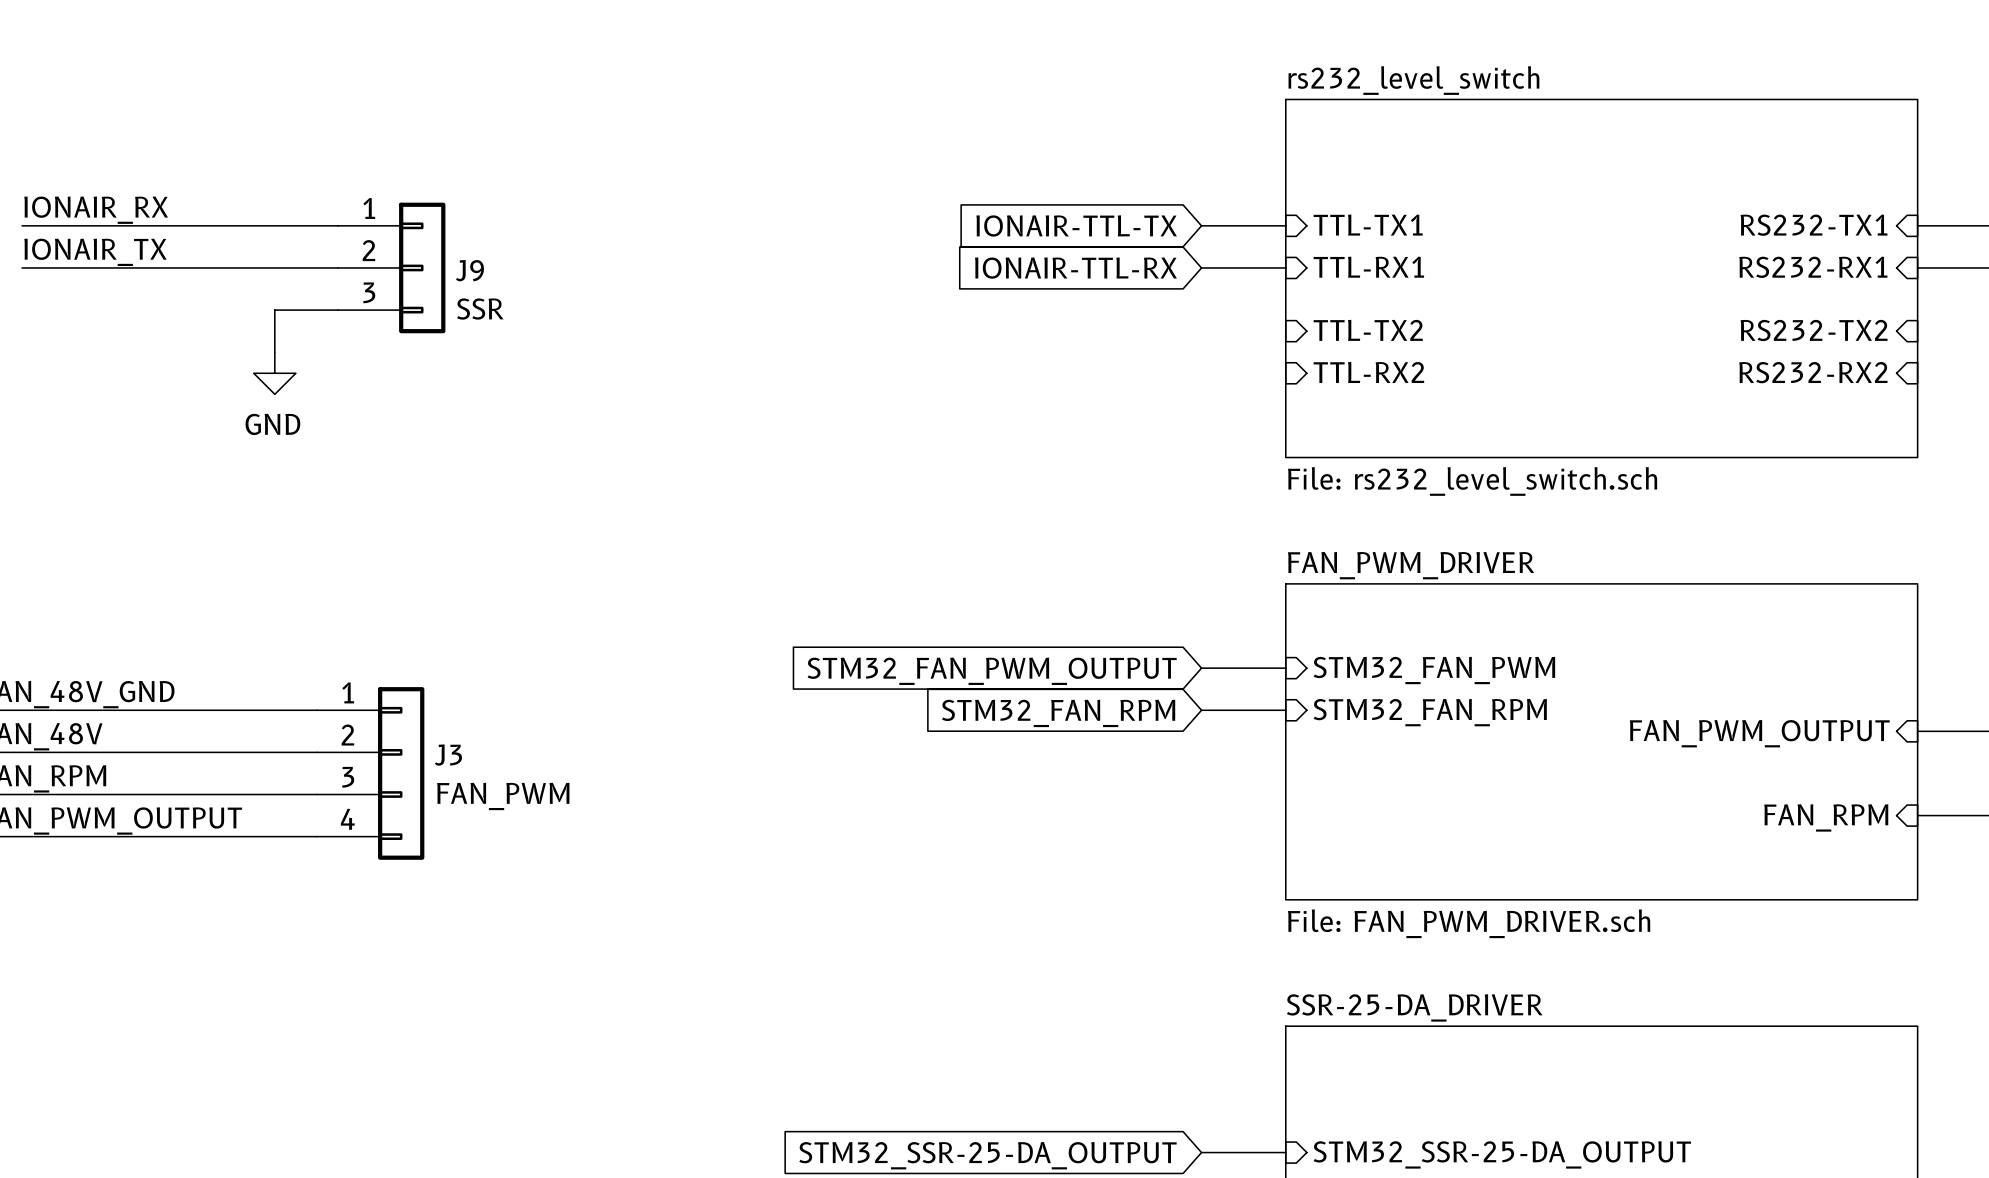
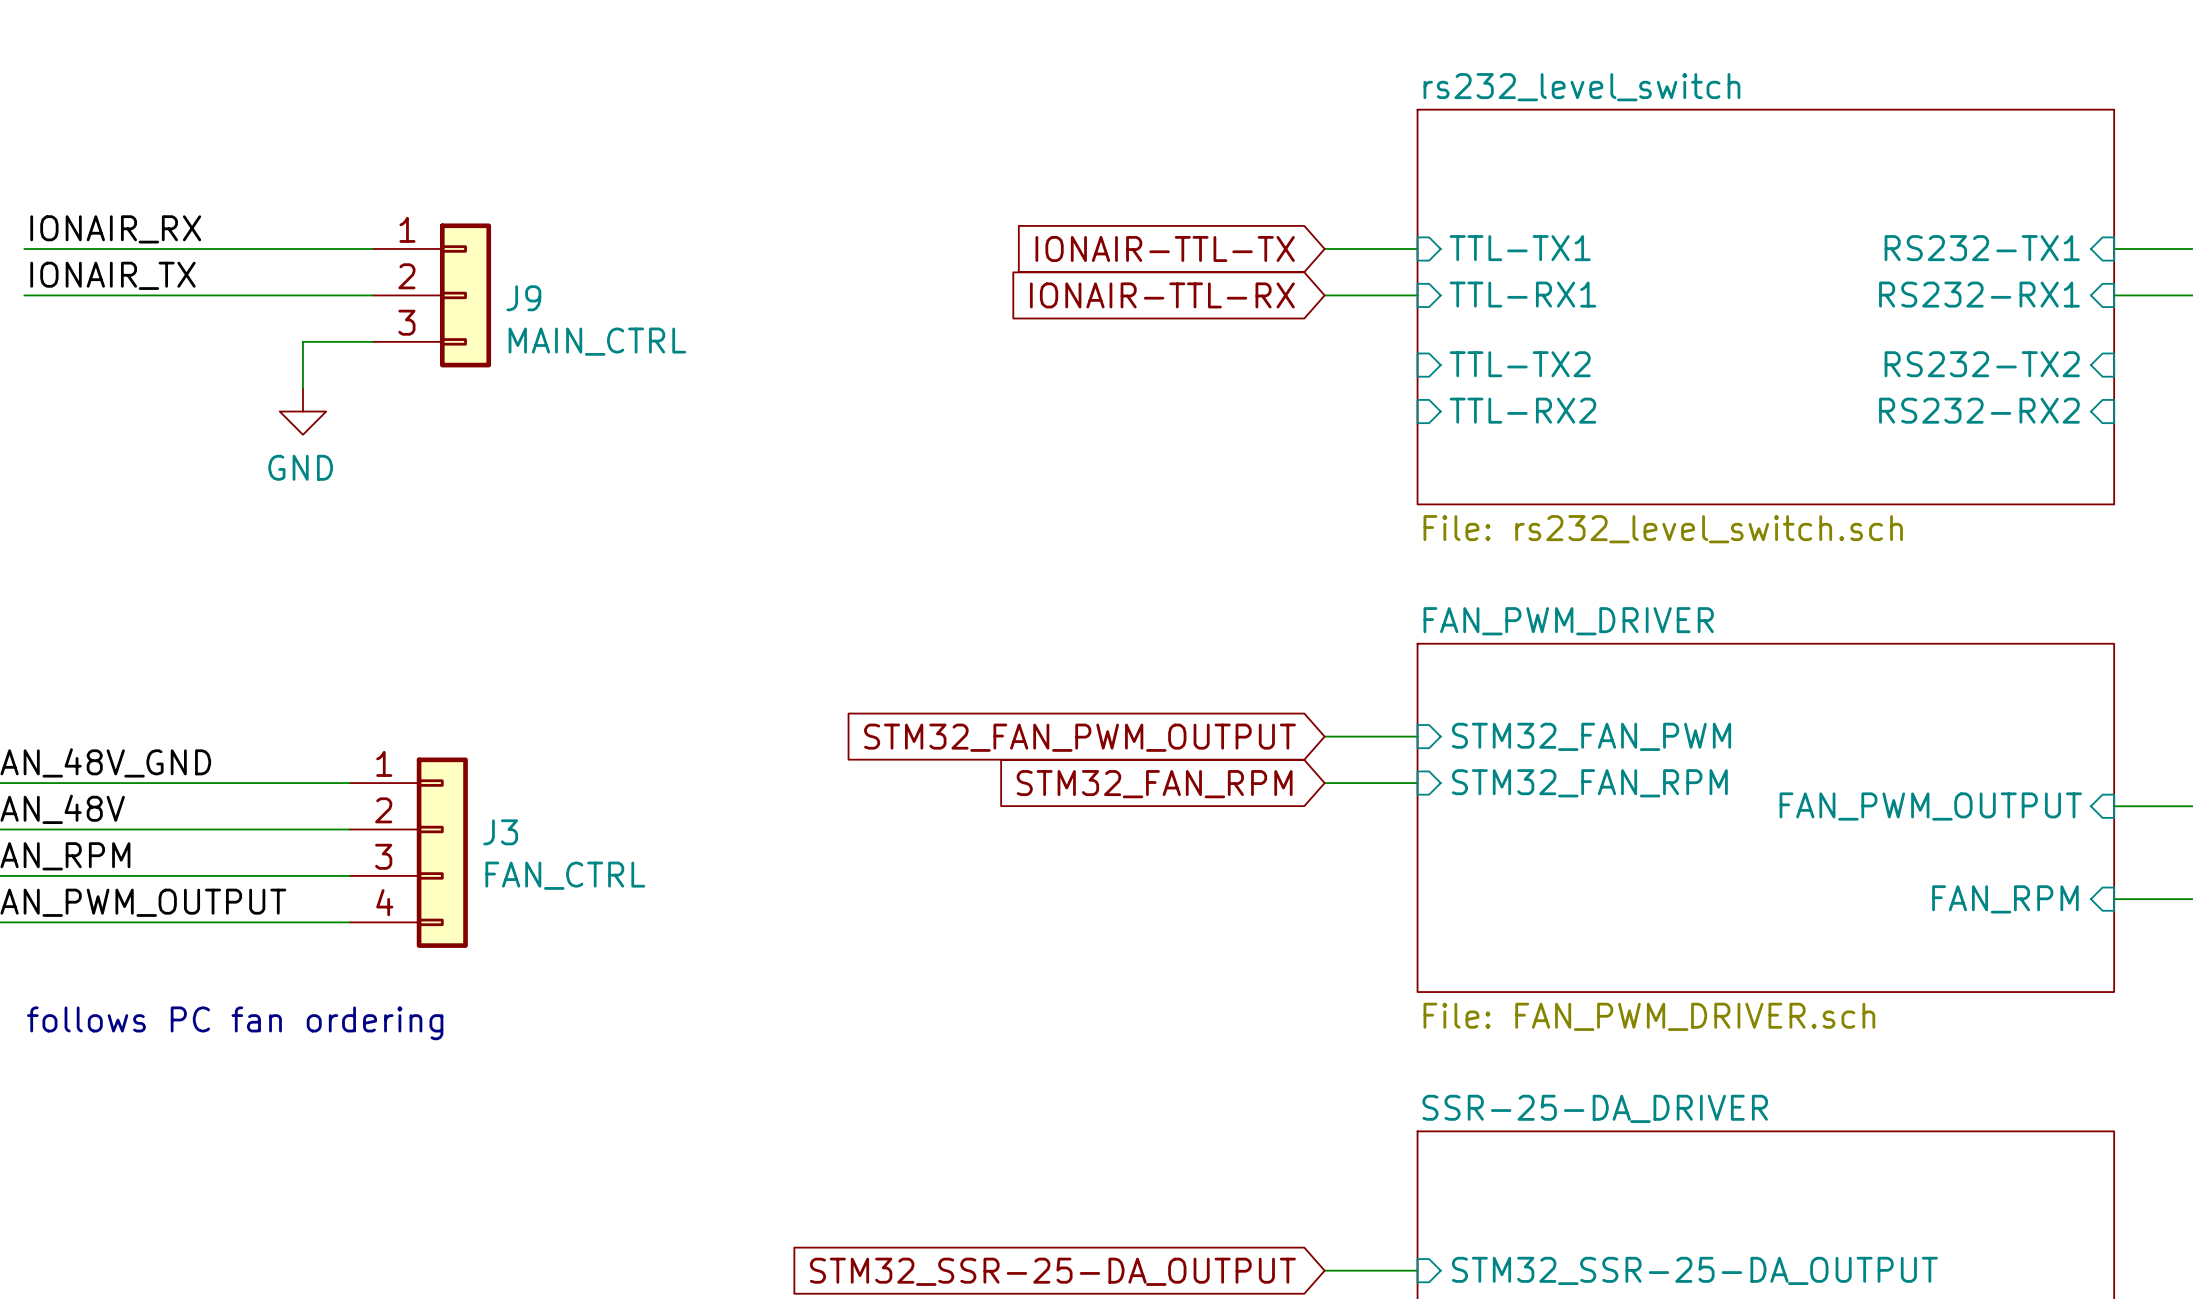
J9 value: SSR (480, 309) -> MAIN_CTRL (597, 341)
J3 value: FAN_PWM (503, 796) -> FAN_CTRL (565, 875)
text: none -> follows PC fan ordering (235, 1023)

